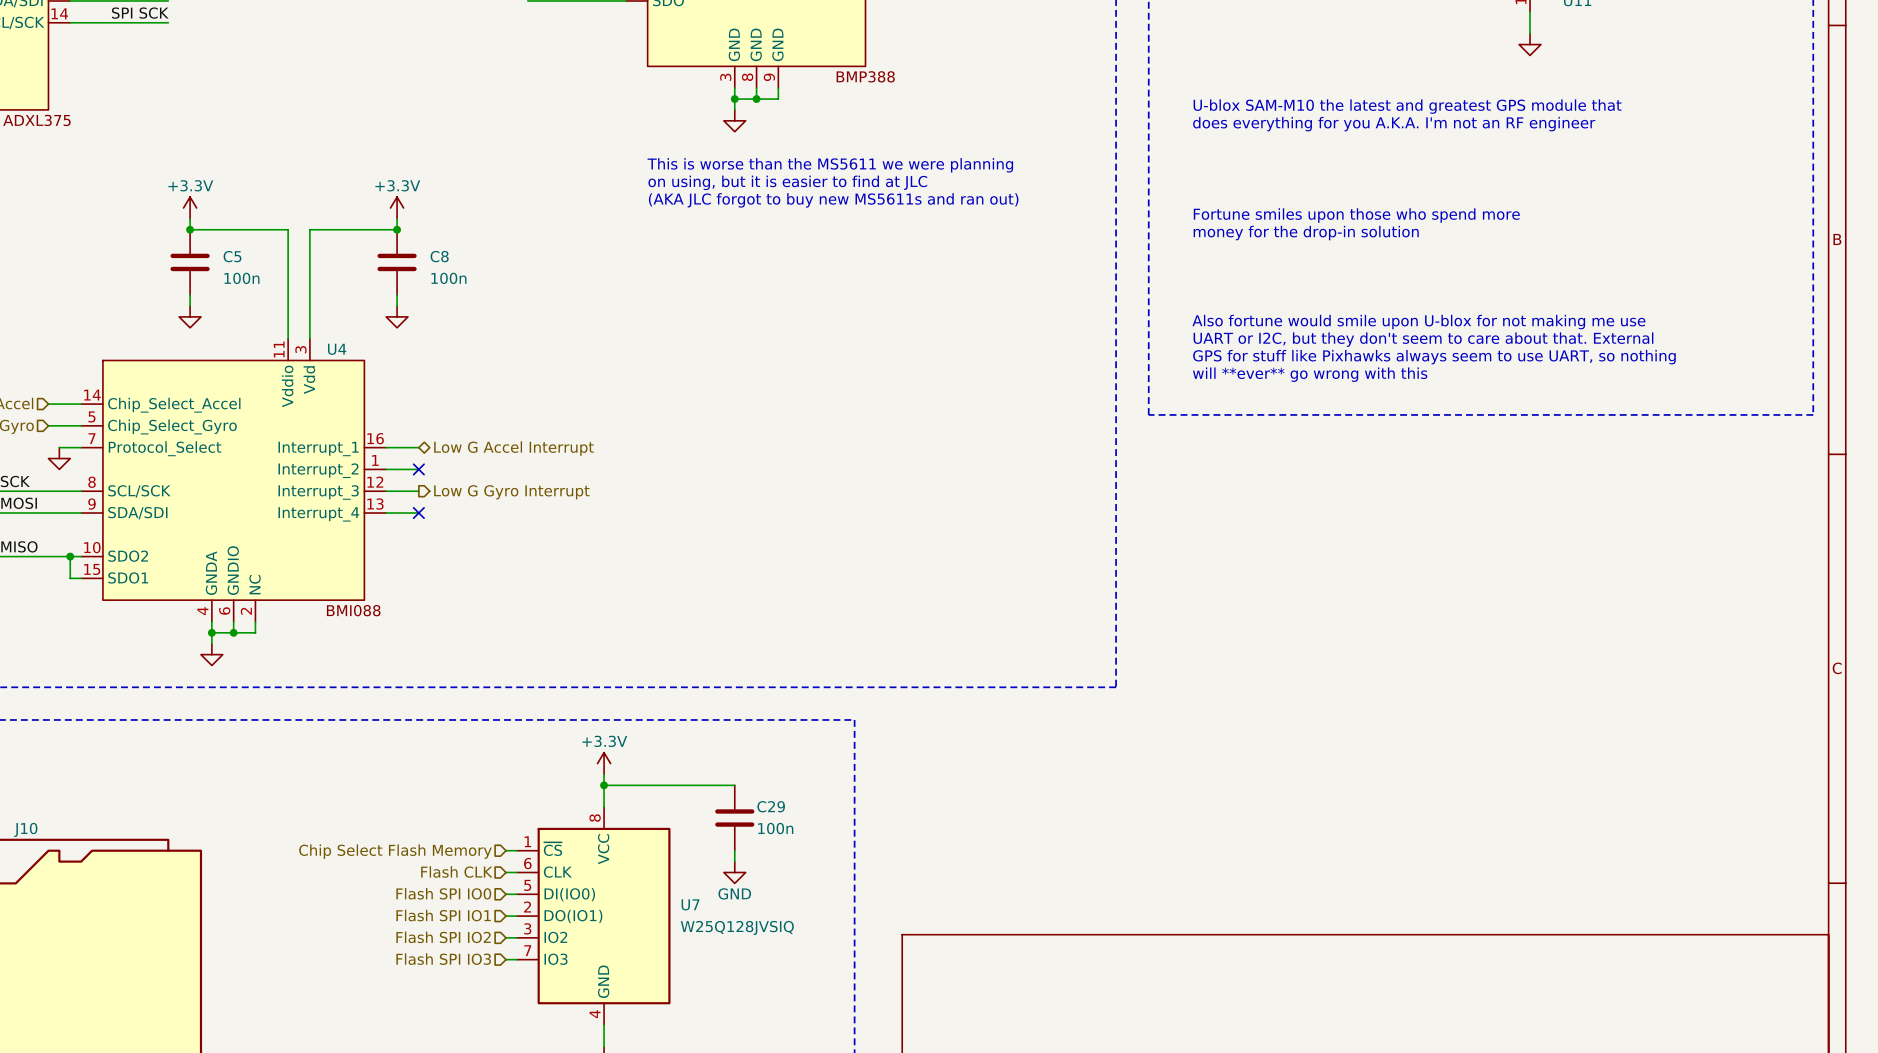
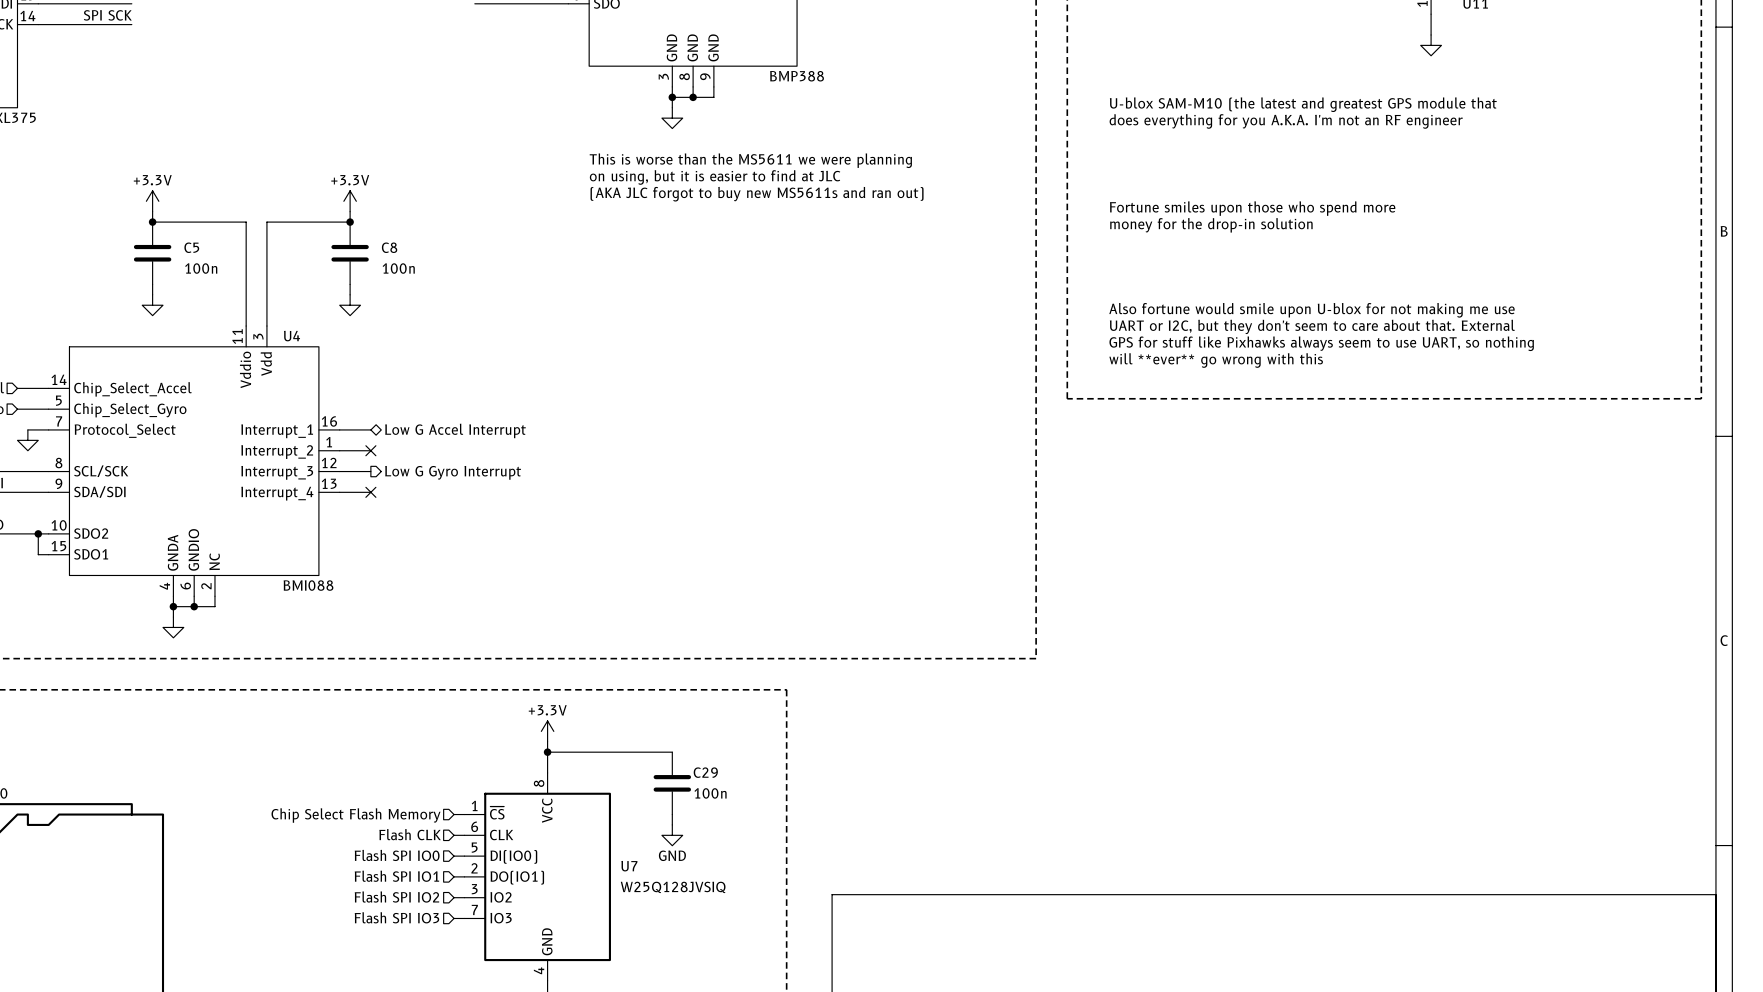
text: U-blox SAM-M10 the latest and greatest GPS module that (1407, 106) -> U-blox SAM-M10 (the latest and greatest GPS module that (1303, 104)

